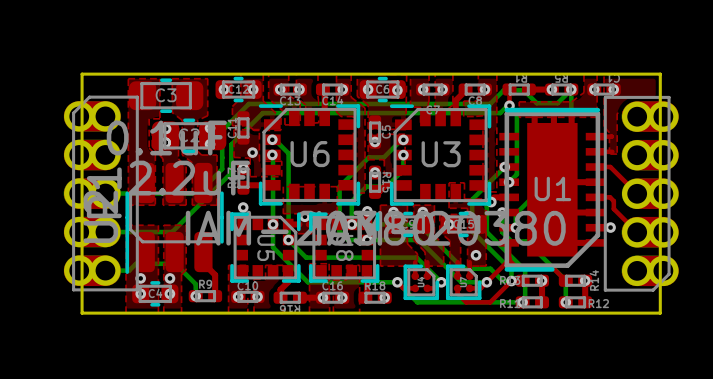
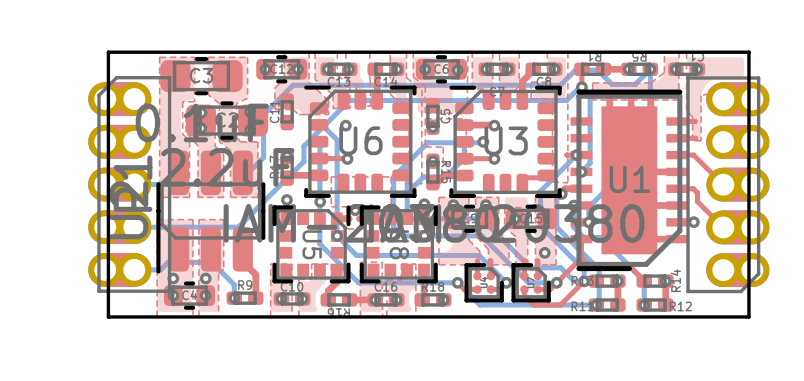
U6 footprint: [258, 104, 361, 206] -> [304, 85, 417, 198]
U3 footprint: [389, 104, 492, 206] -> [449, 85, 562, 199]
bottom track: (500, 113) (262, 113) (231, 144) (231, 172) (172, 232) -> (571, 95) (566, 100) (349, 100) (303, 146) (303, 161) (238, 227) (208, 227)
top zone outline: (233, 129) (233, 157) (250, 158) (250, 176) (281, 176) (281, 161) (259, 161) (259, 129) (233, 129) -> none
via: (272, 139) -> none
top track: none -> (464, 125) (494, 125)
bottom track: (403, 139) (383, 157) (368, 157) -> (483, 141) (427, 142) (426, 144)
via: (403, 139) -> none
via: none -> (345, 125)
via: none -> (494, 125)
via: (252, 152) -> none
via: (272, 154) -> none
via: (403, 155) -> none
via: none -> (483, 141)
top track: none -> (567, 155) (576, 155)
top track: none -> (319, 158) (347, 158)
via: none -> (347, 158)
top track: none -> (464, 158) (494, 158)
via: none -> (494, 158)
top track: none -> (524, 177) (544, 177)
top zone outline: (467, 208) (449, 208) (449, 182) (464, 182) (464, 199) (486, 199) (486, 266) -> (535, 200) (535, 197) (555, 197) (556, 264)
via position: (273, 224) -> (320, 201)
via: (351, 224) -> none

